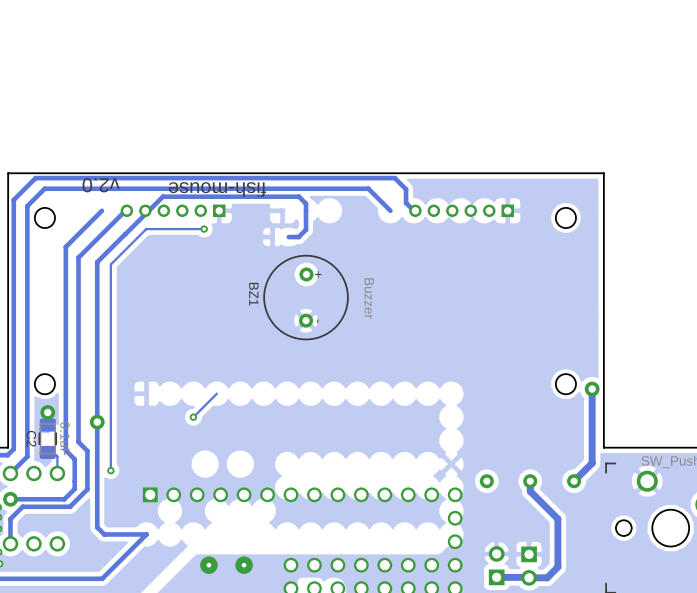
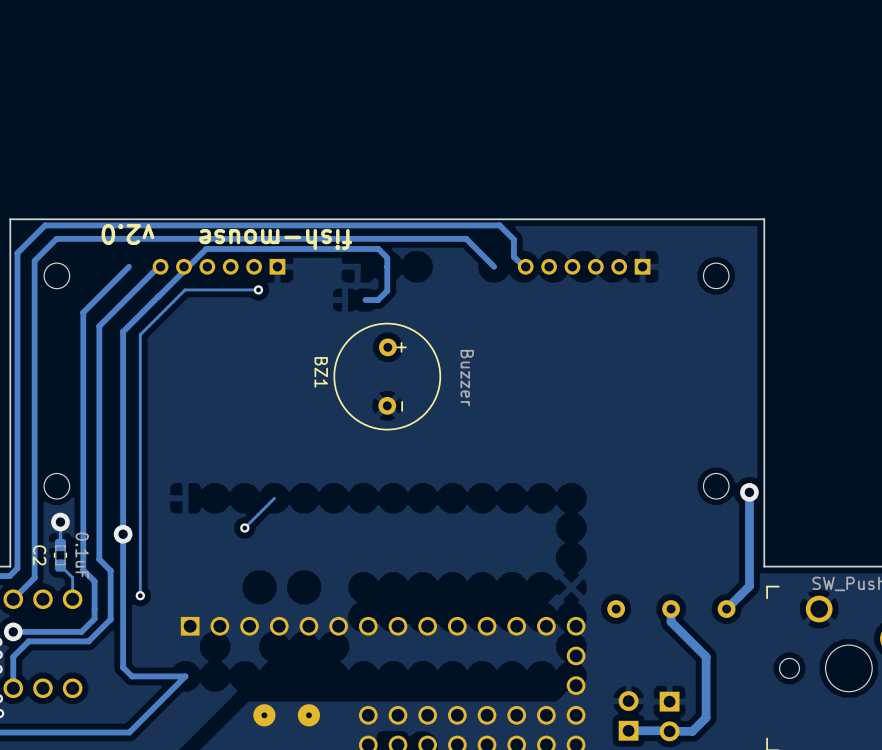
C2 footprint: [38, 418, 57, 460] -> [53, 538, 68, 572]

